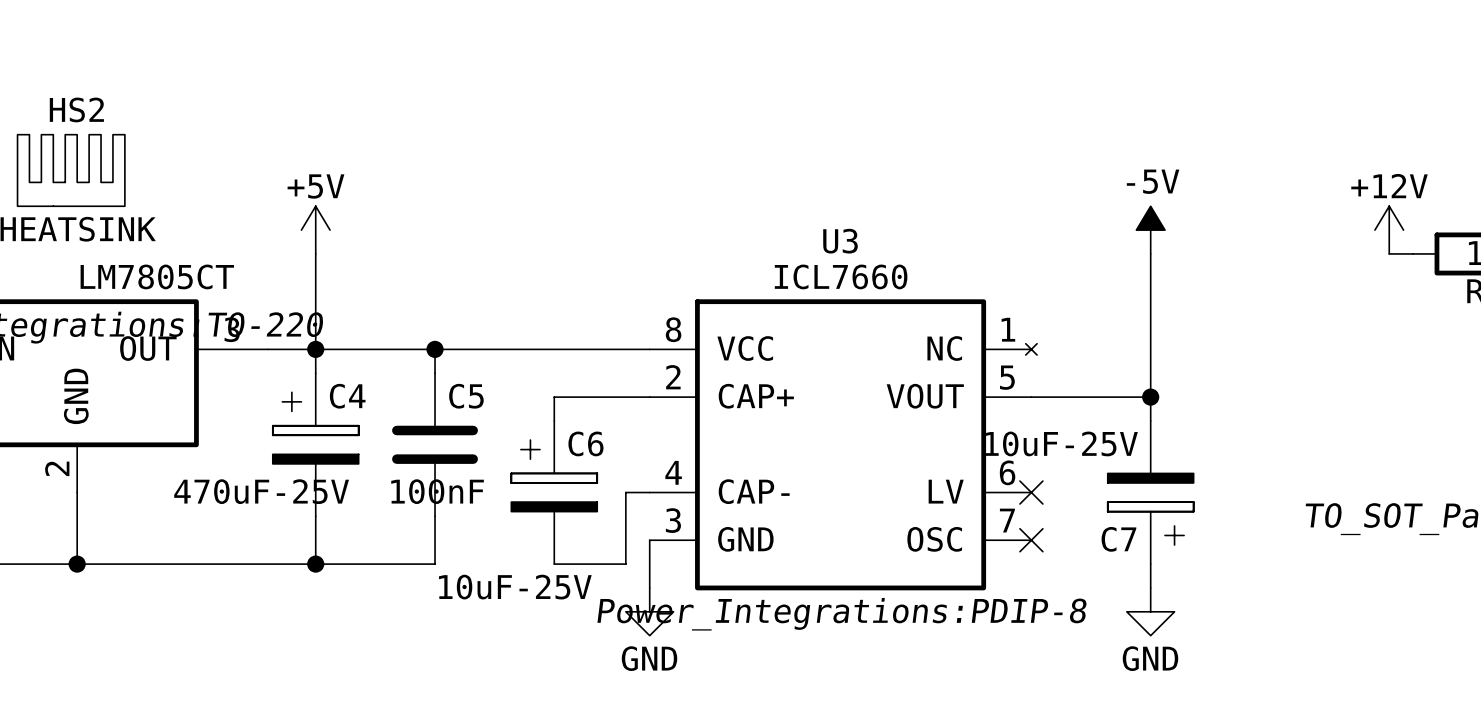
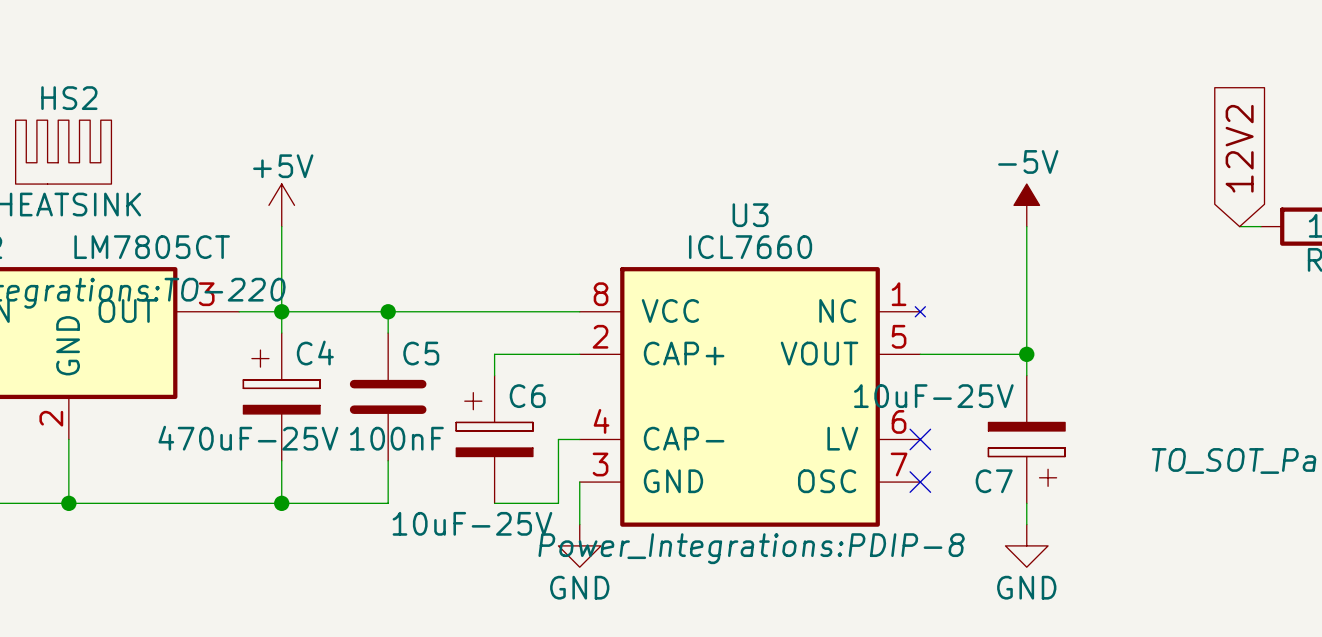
global label: none -> 12V2 (1239, 148)
power symbol: +12V (1389, 230) -> none

